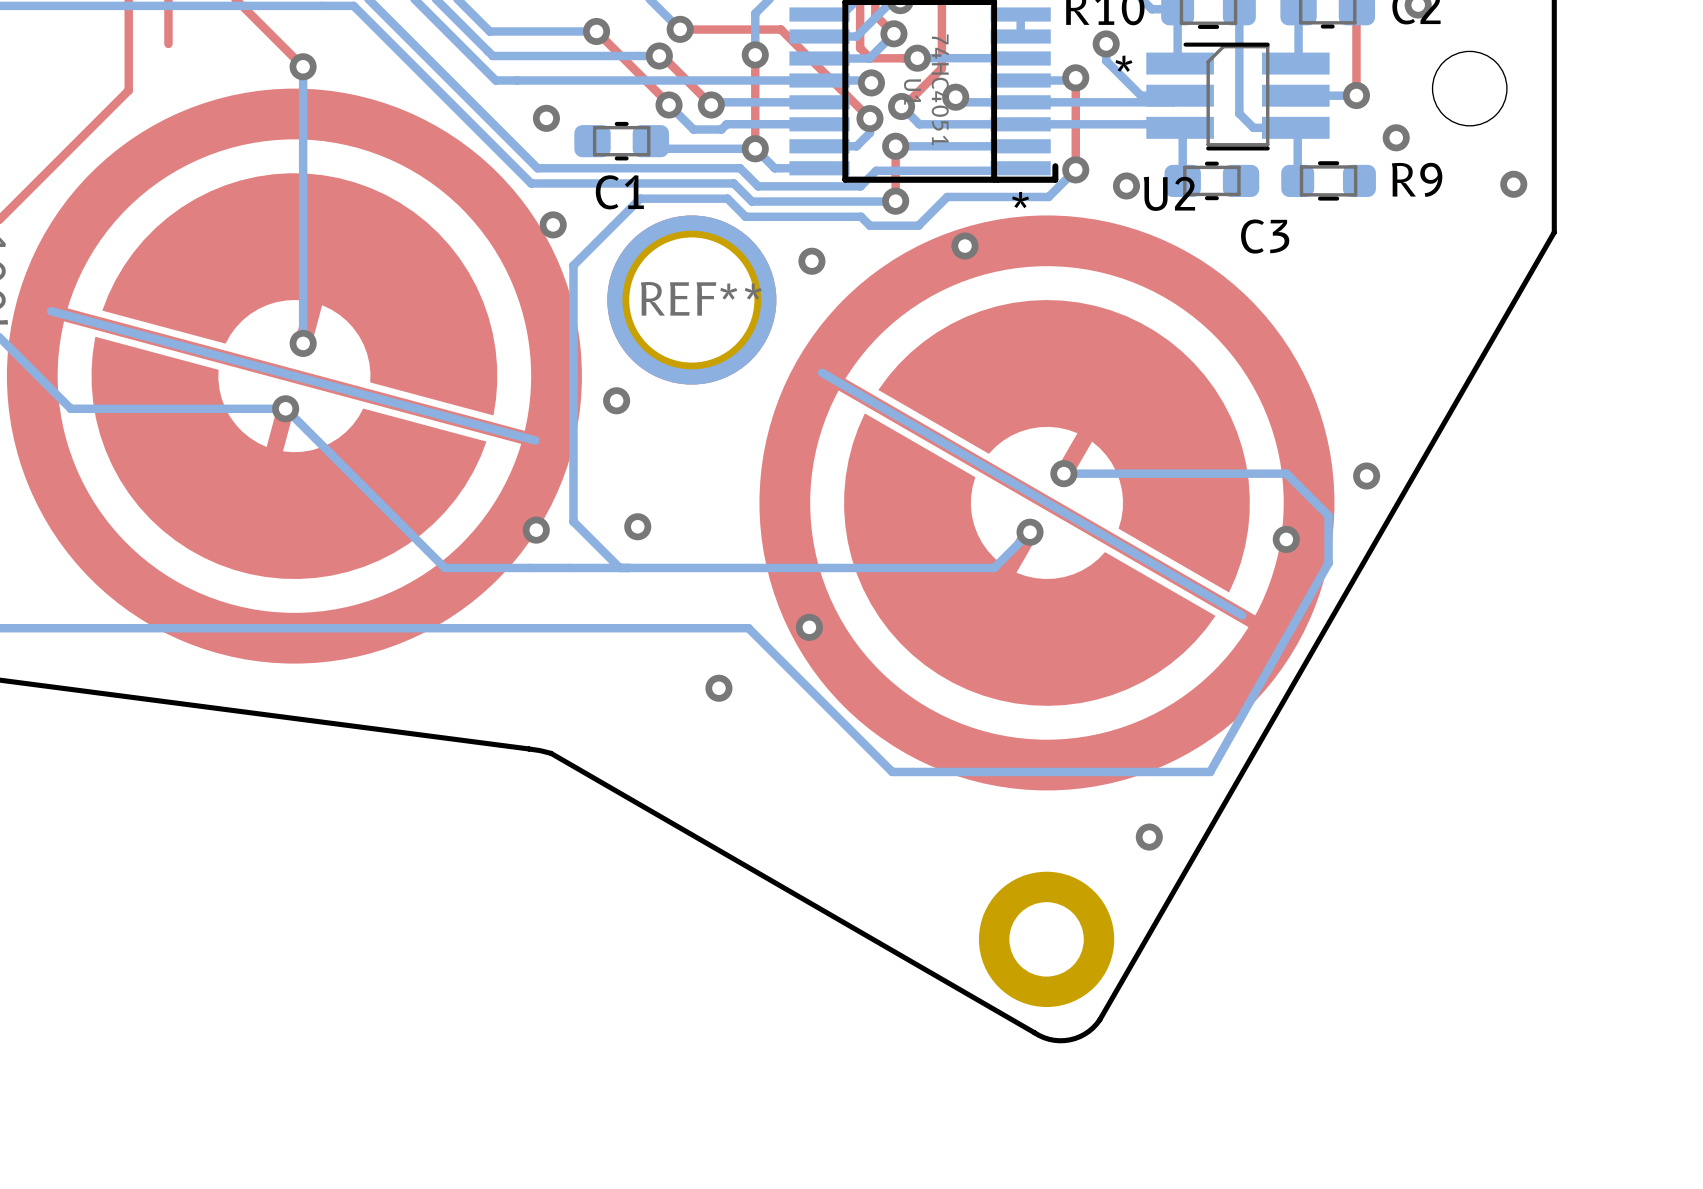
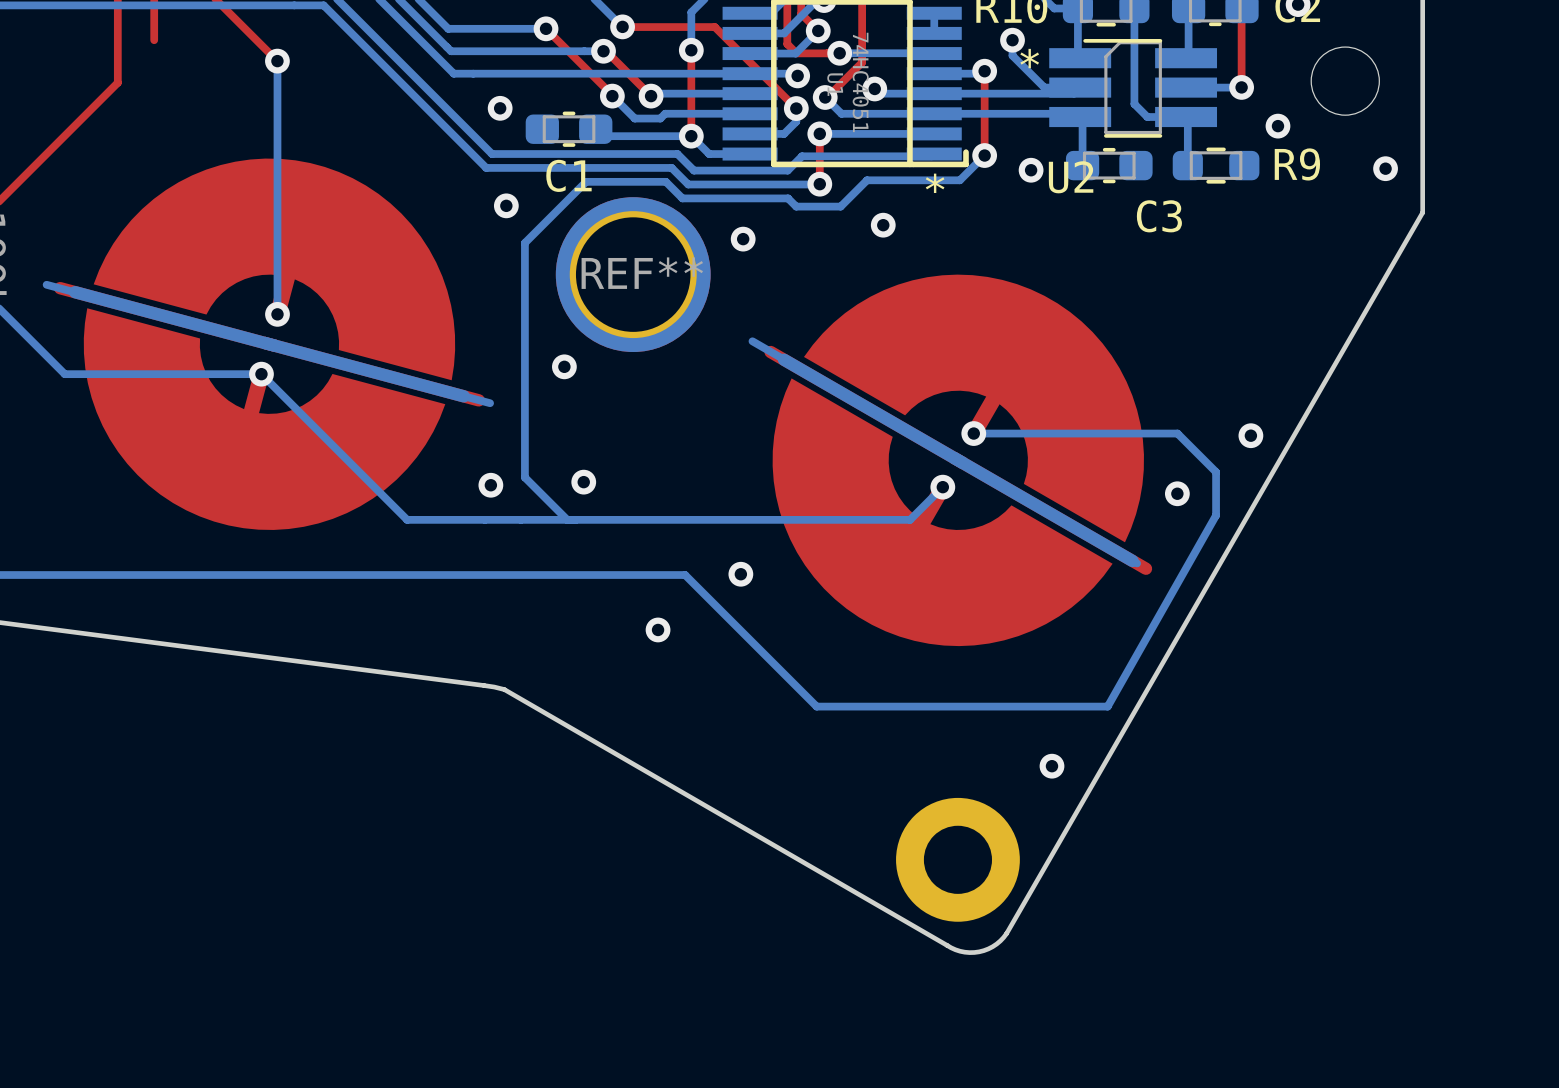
part footprint: [6, 88, 582, 664] -> [53, 158, 485, 530]
part footprint: [759, 215, 1335, 791] -> [764, 274, 1153, 647]

